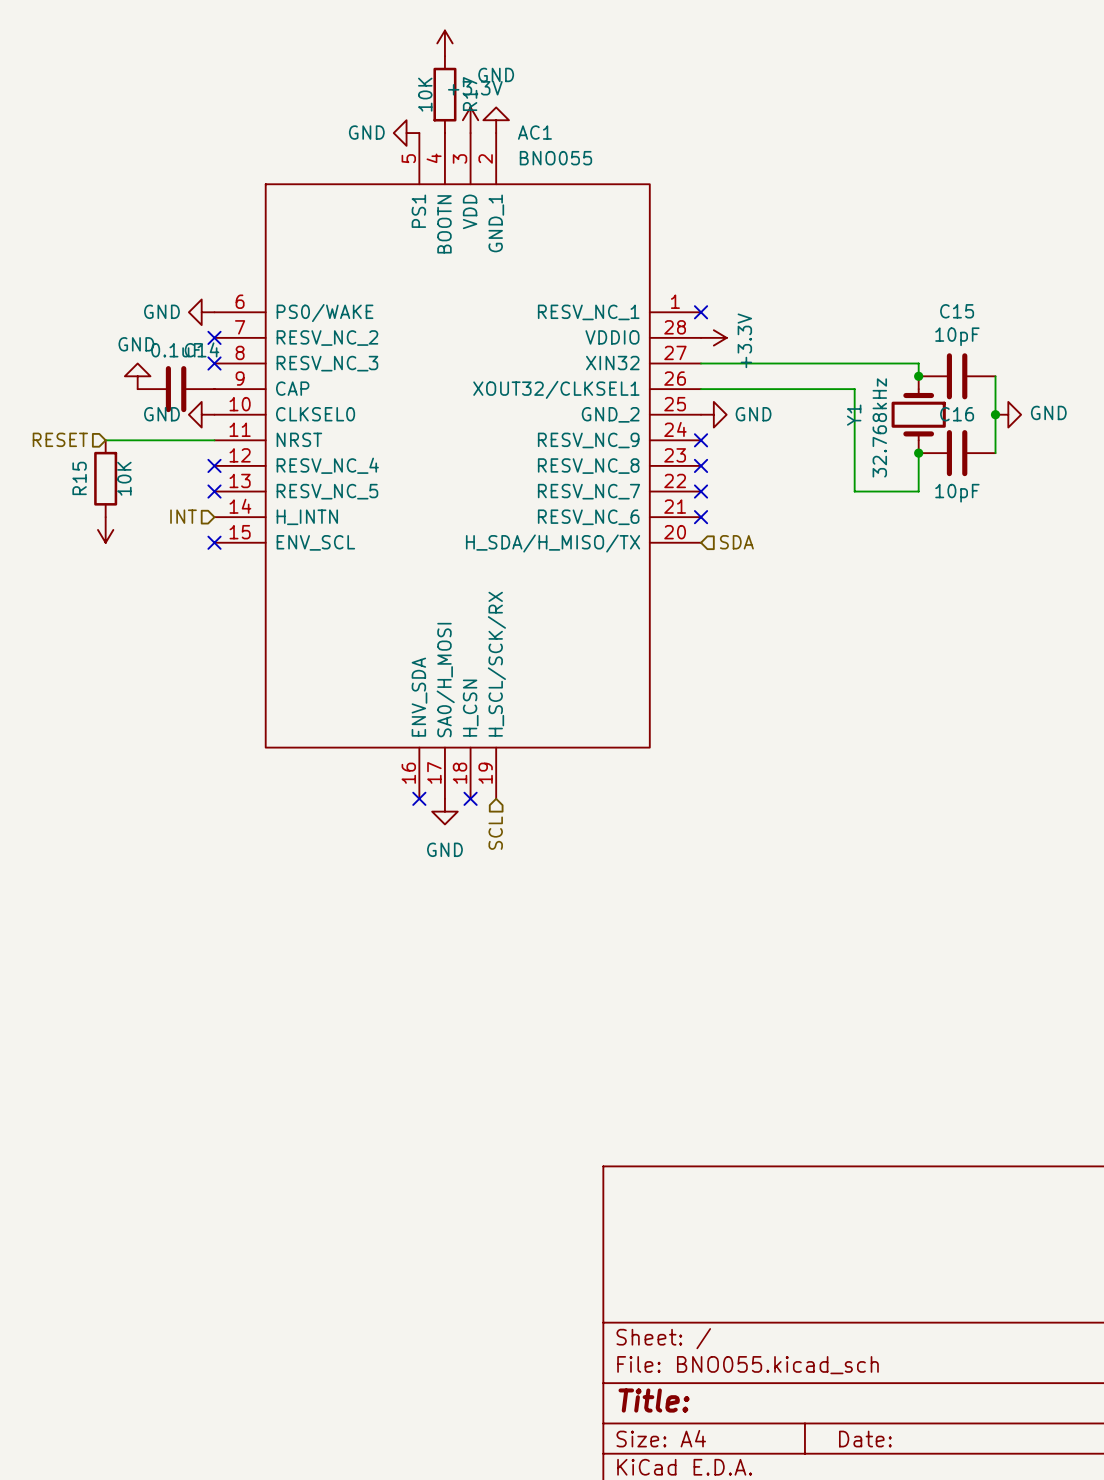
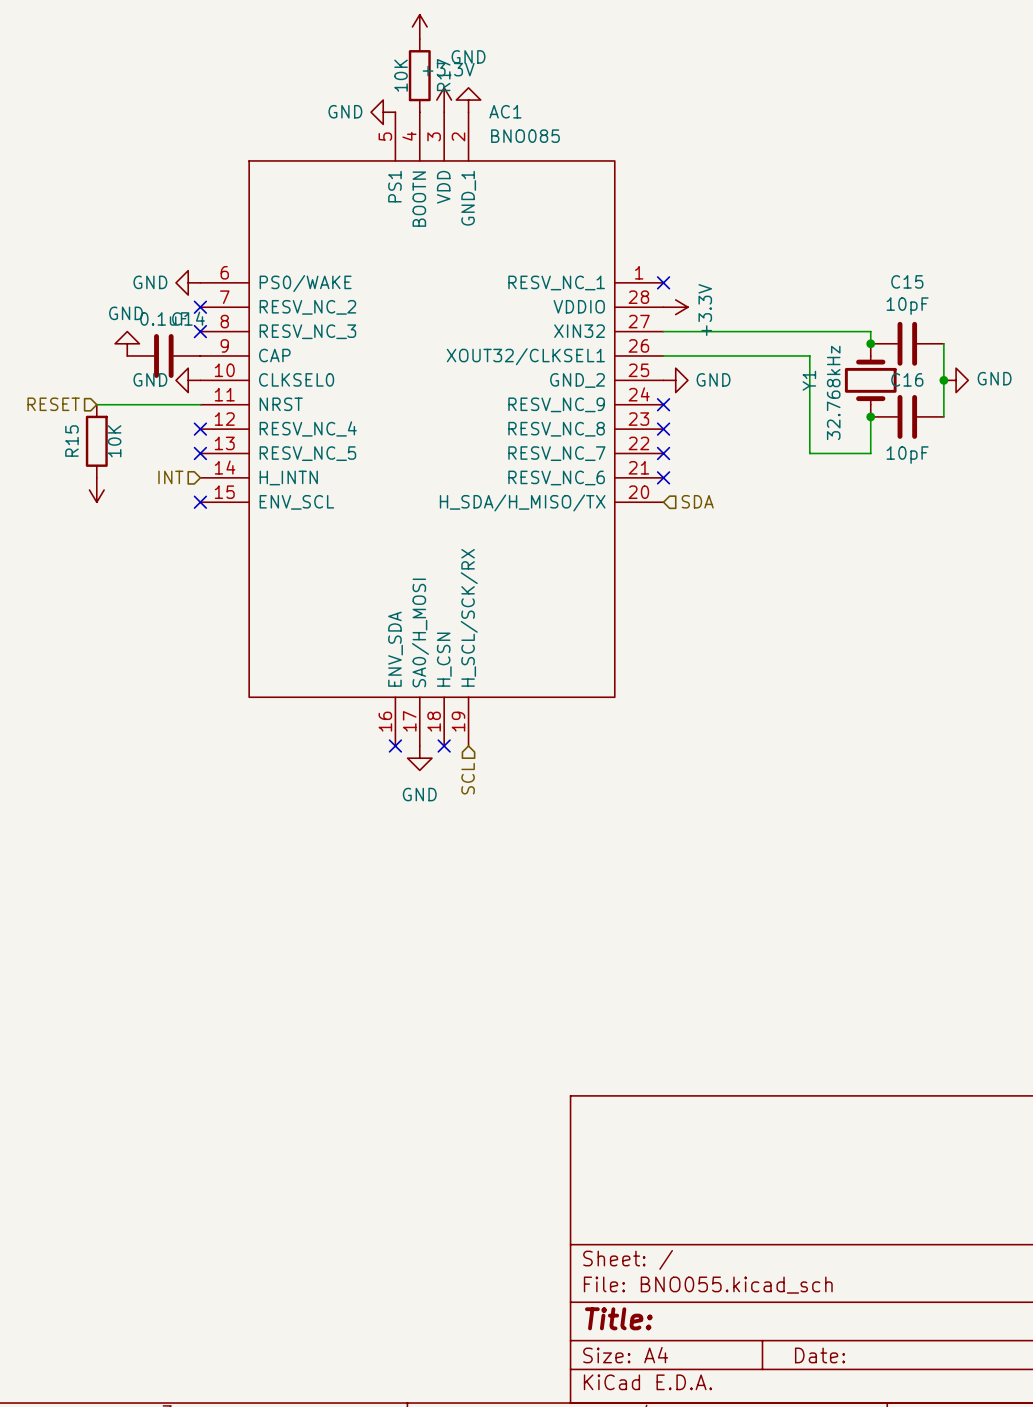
AC1 value: BNO055 (555, 158) -> BNO085 (525, 136)

